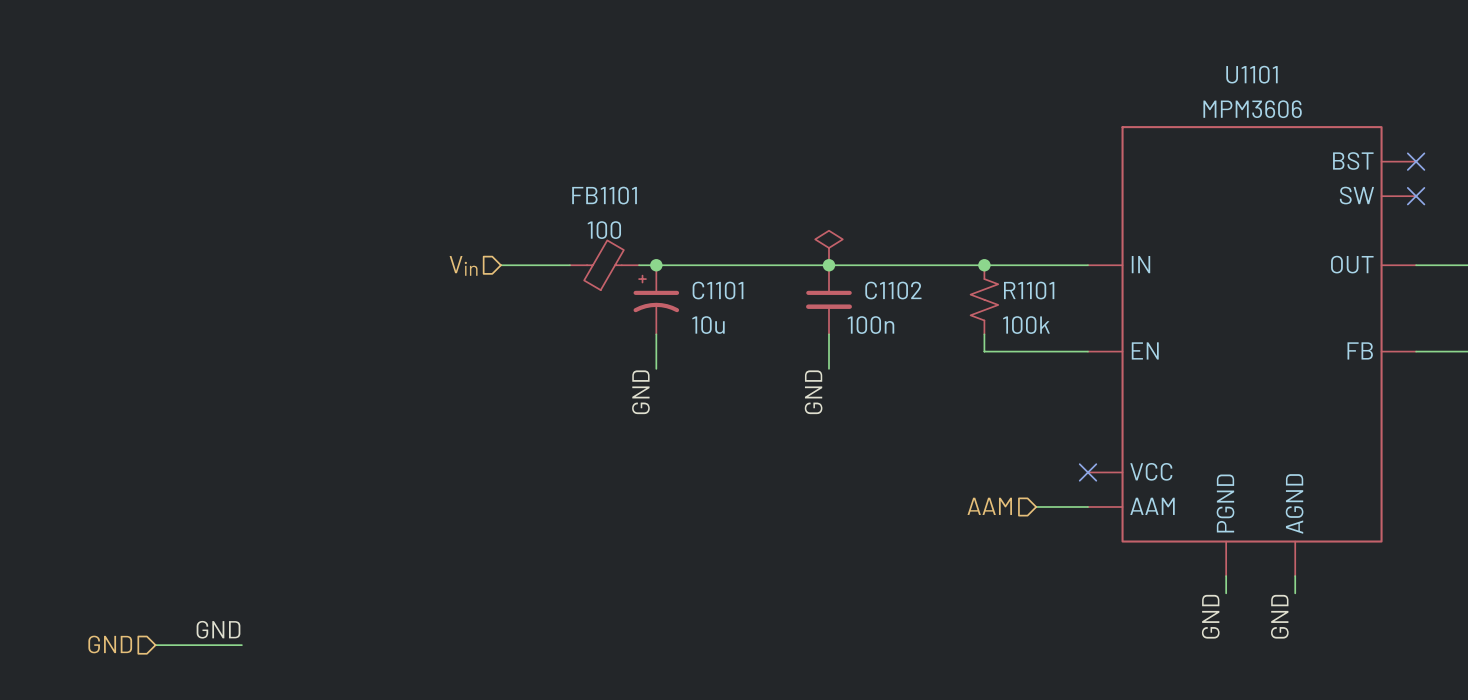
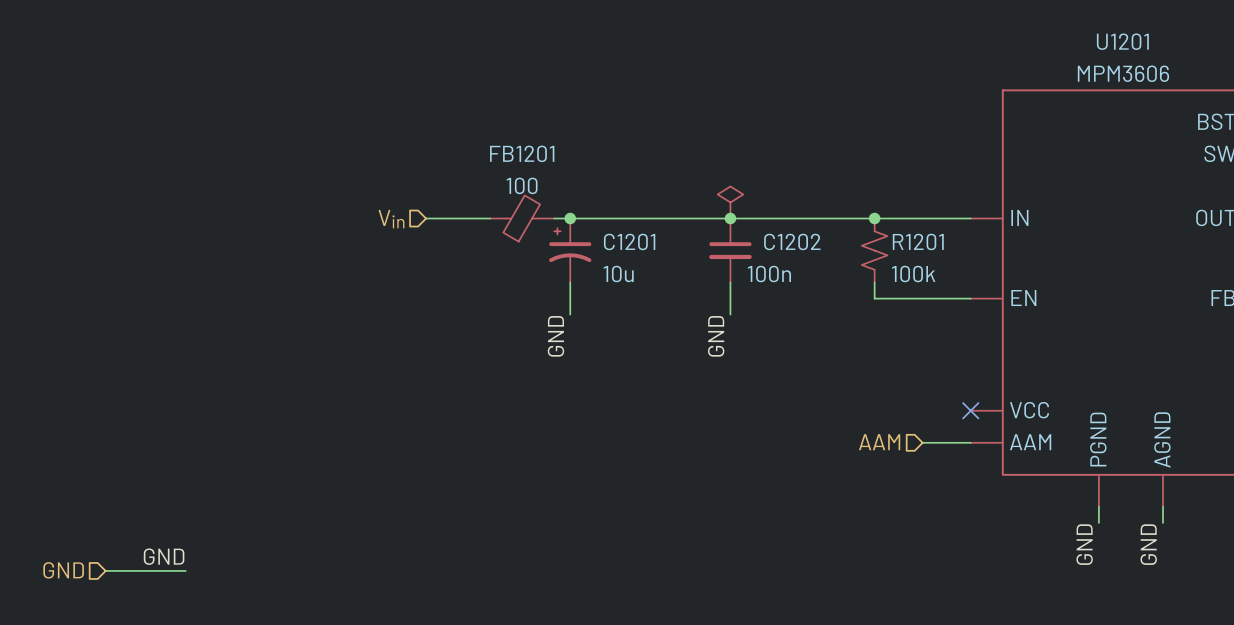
U1101 name: U1101 (1251, 74) -> U1201 (1122, 41)
FB1101 name: FB1101 (604, 195) -> FB1201 (522, 153)
C1101 name: C1101 (718, 290) -> C1201 (629, 241)
C1102 name: C1102 (893, 290) -> C1202 (792, 241)
R1101 name: R1101 (1029, 290) -> R1201 (918, 241)

